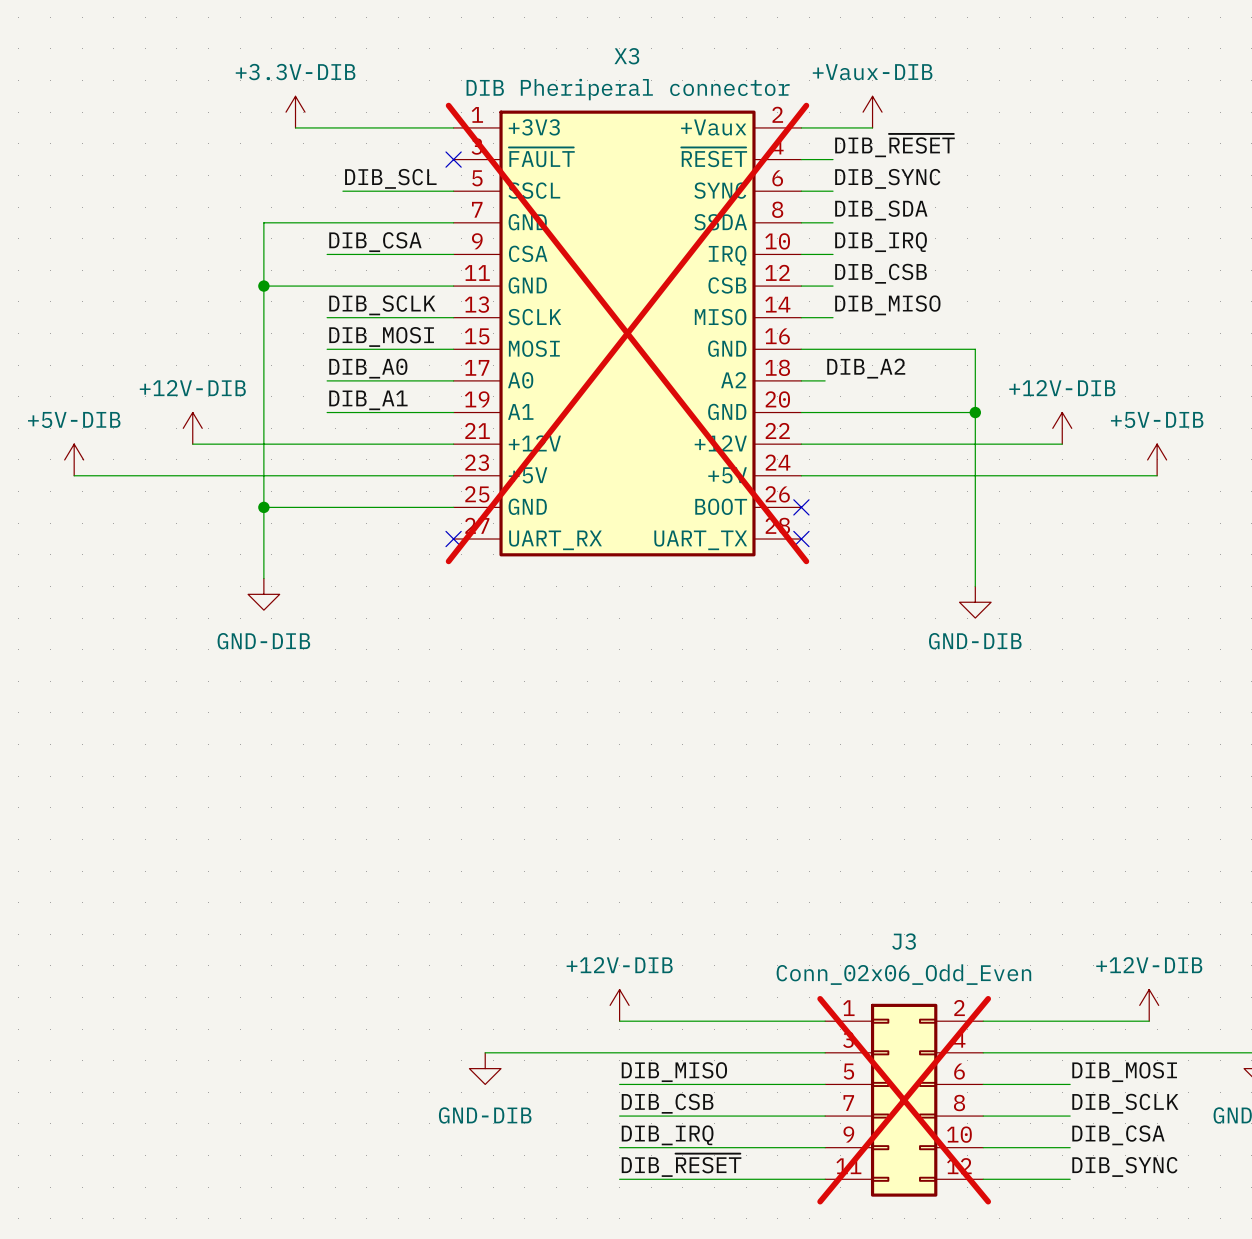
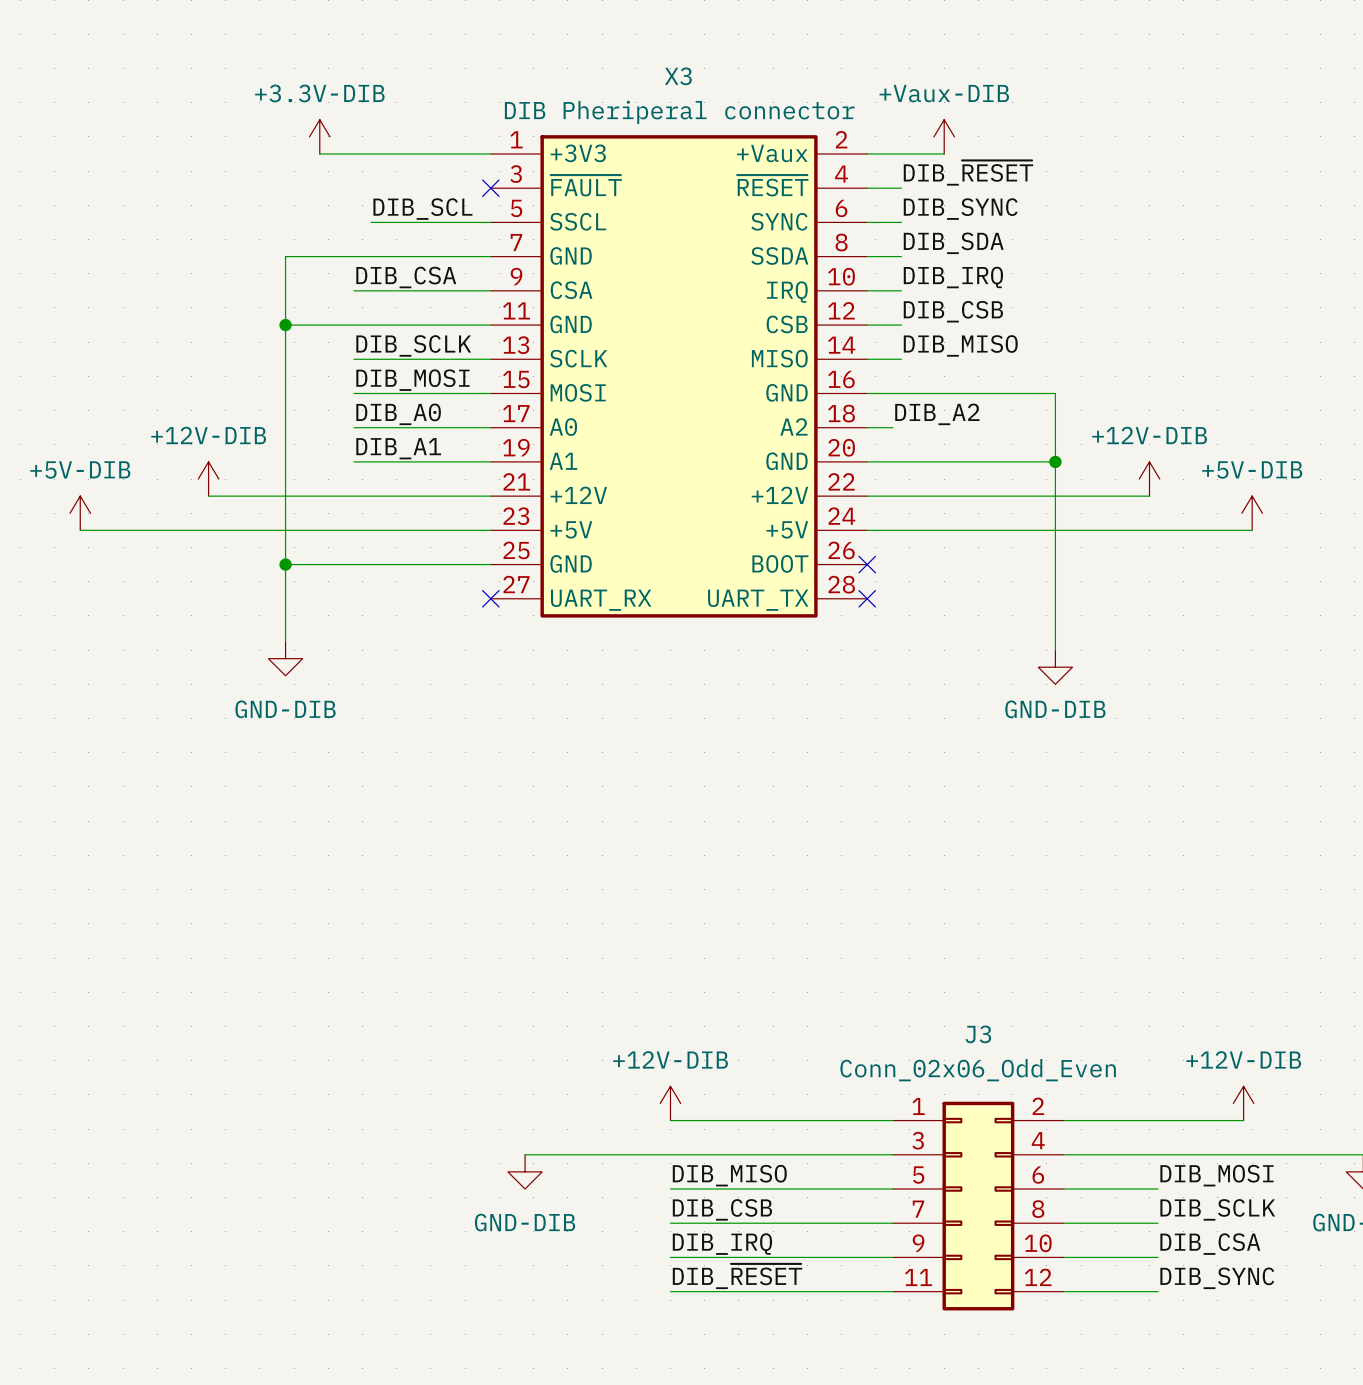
X3 do-not-place cross: (627, 333) -> none
J3 do-not-place cross: (904, 1100) -> none

